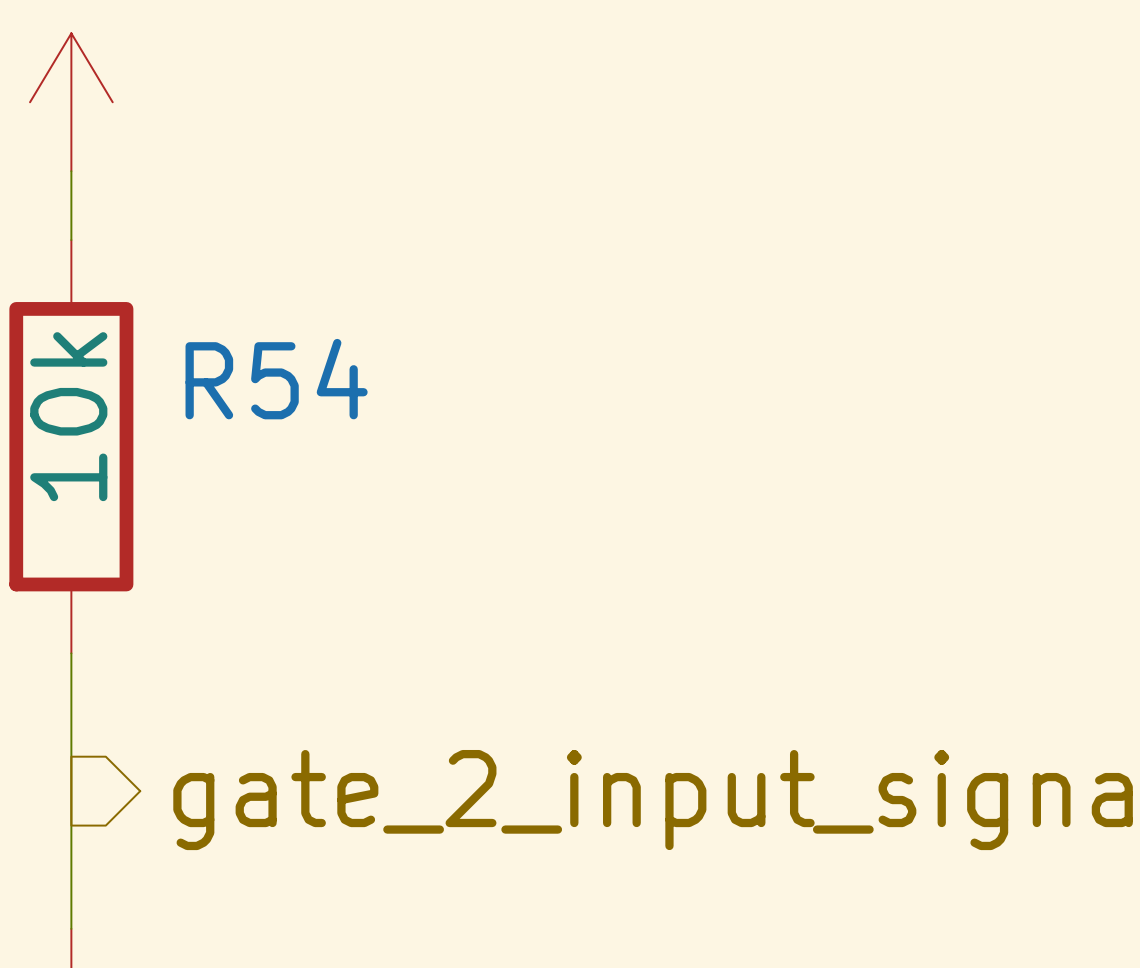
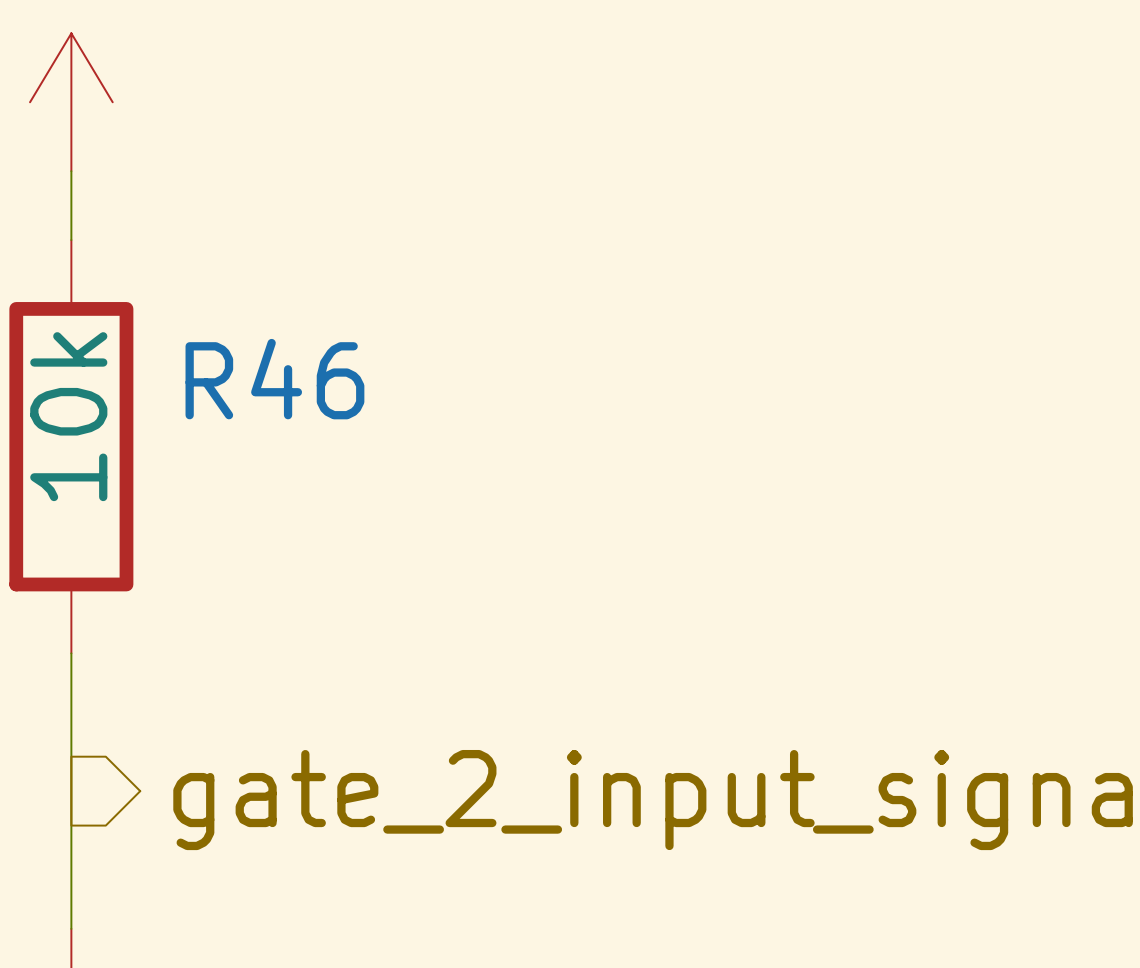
R54 name: R54 (276, 379) -> R46 (274, 379)

